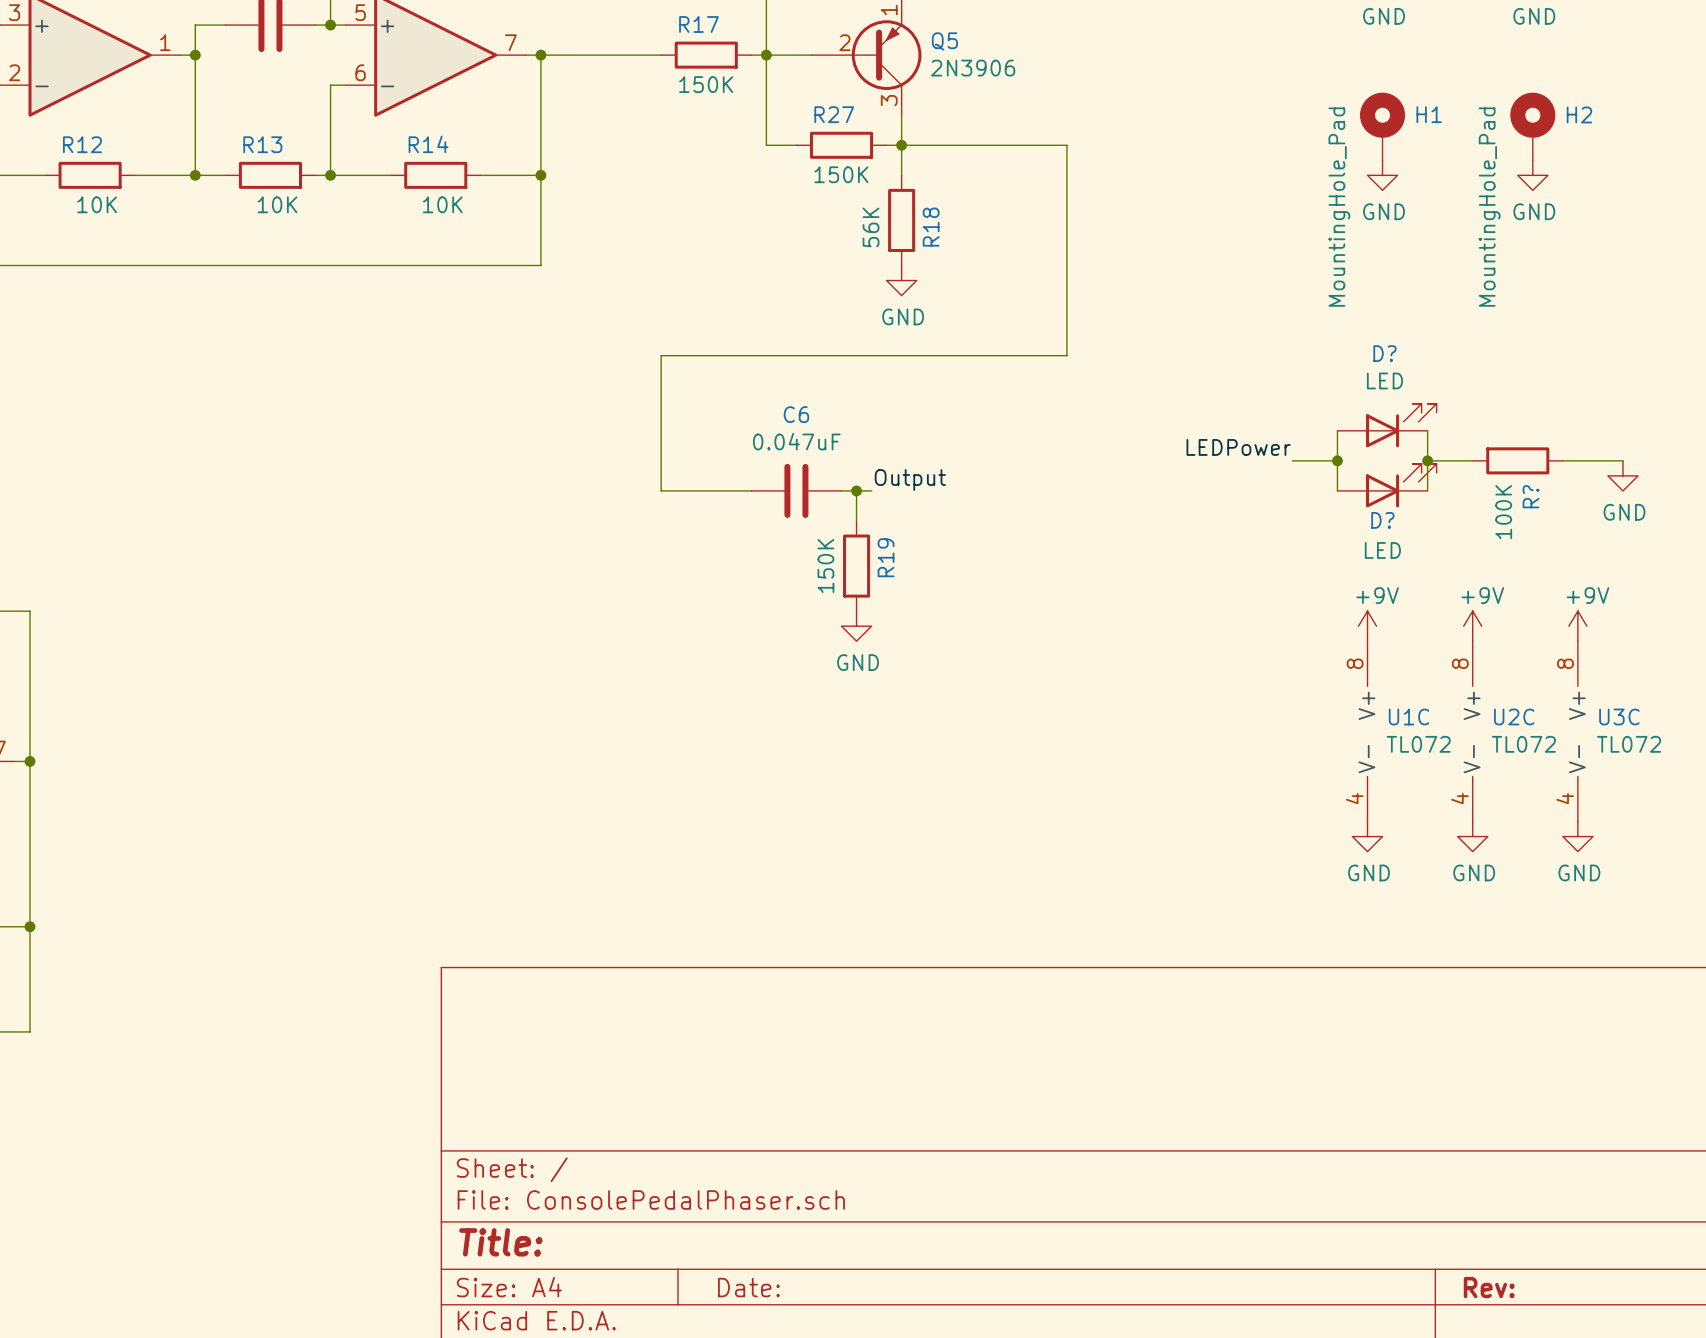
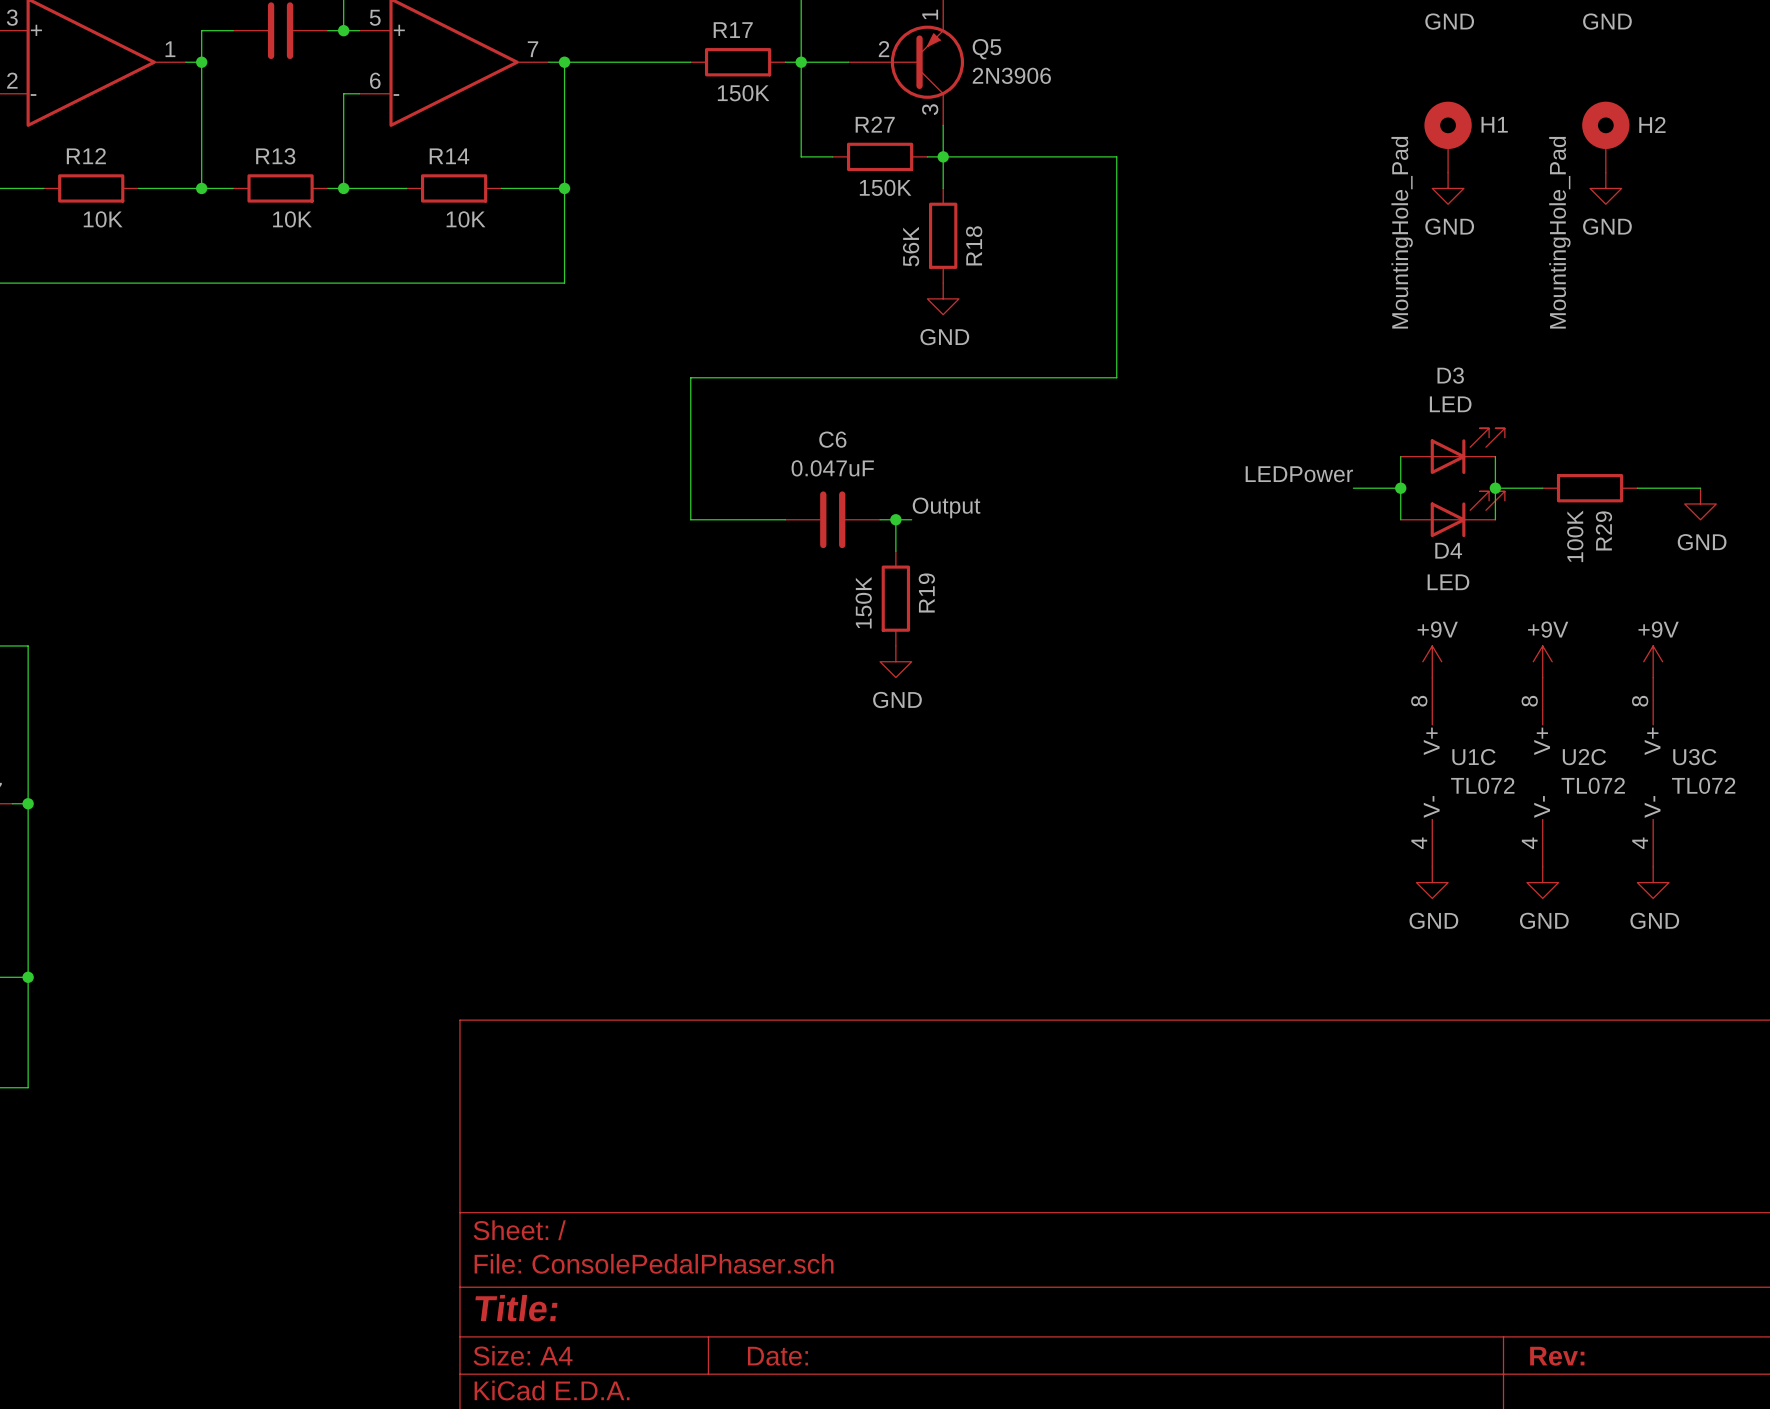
D? name: D? (1384, 353) -> D3 (1450, 375)
R? name: R? (1531, 496) -> R29 (1603, 530)
D? name: D? (1382, 520) -> D4 (1448, 550)

